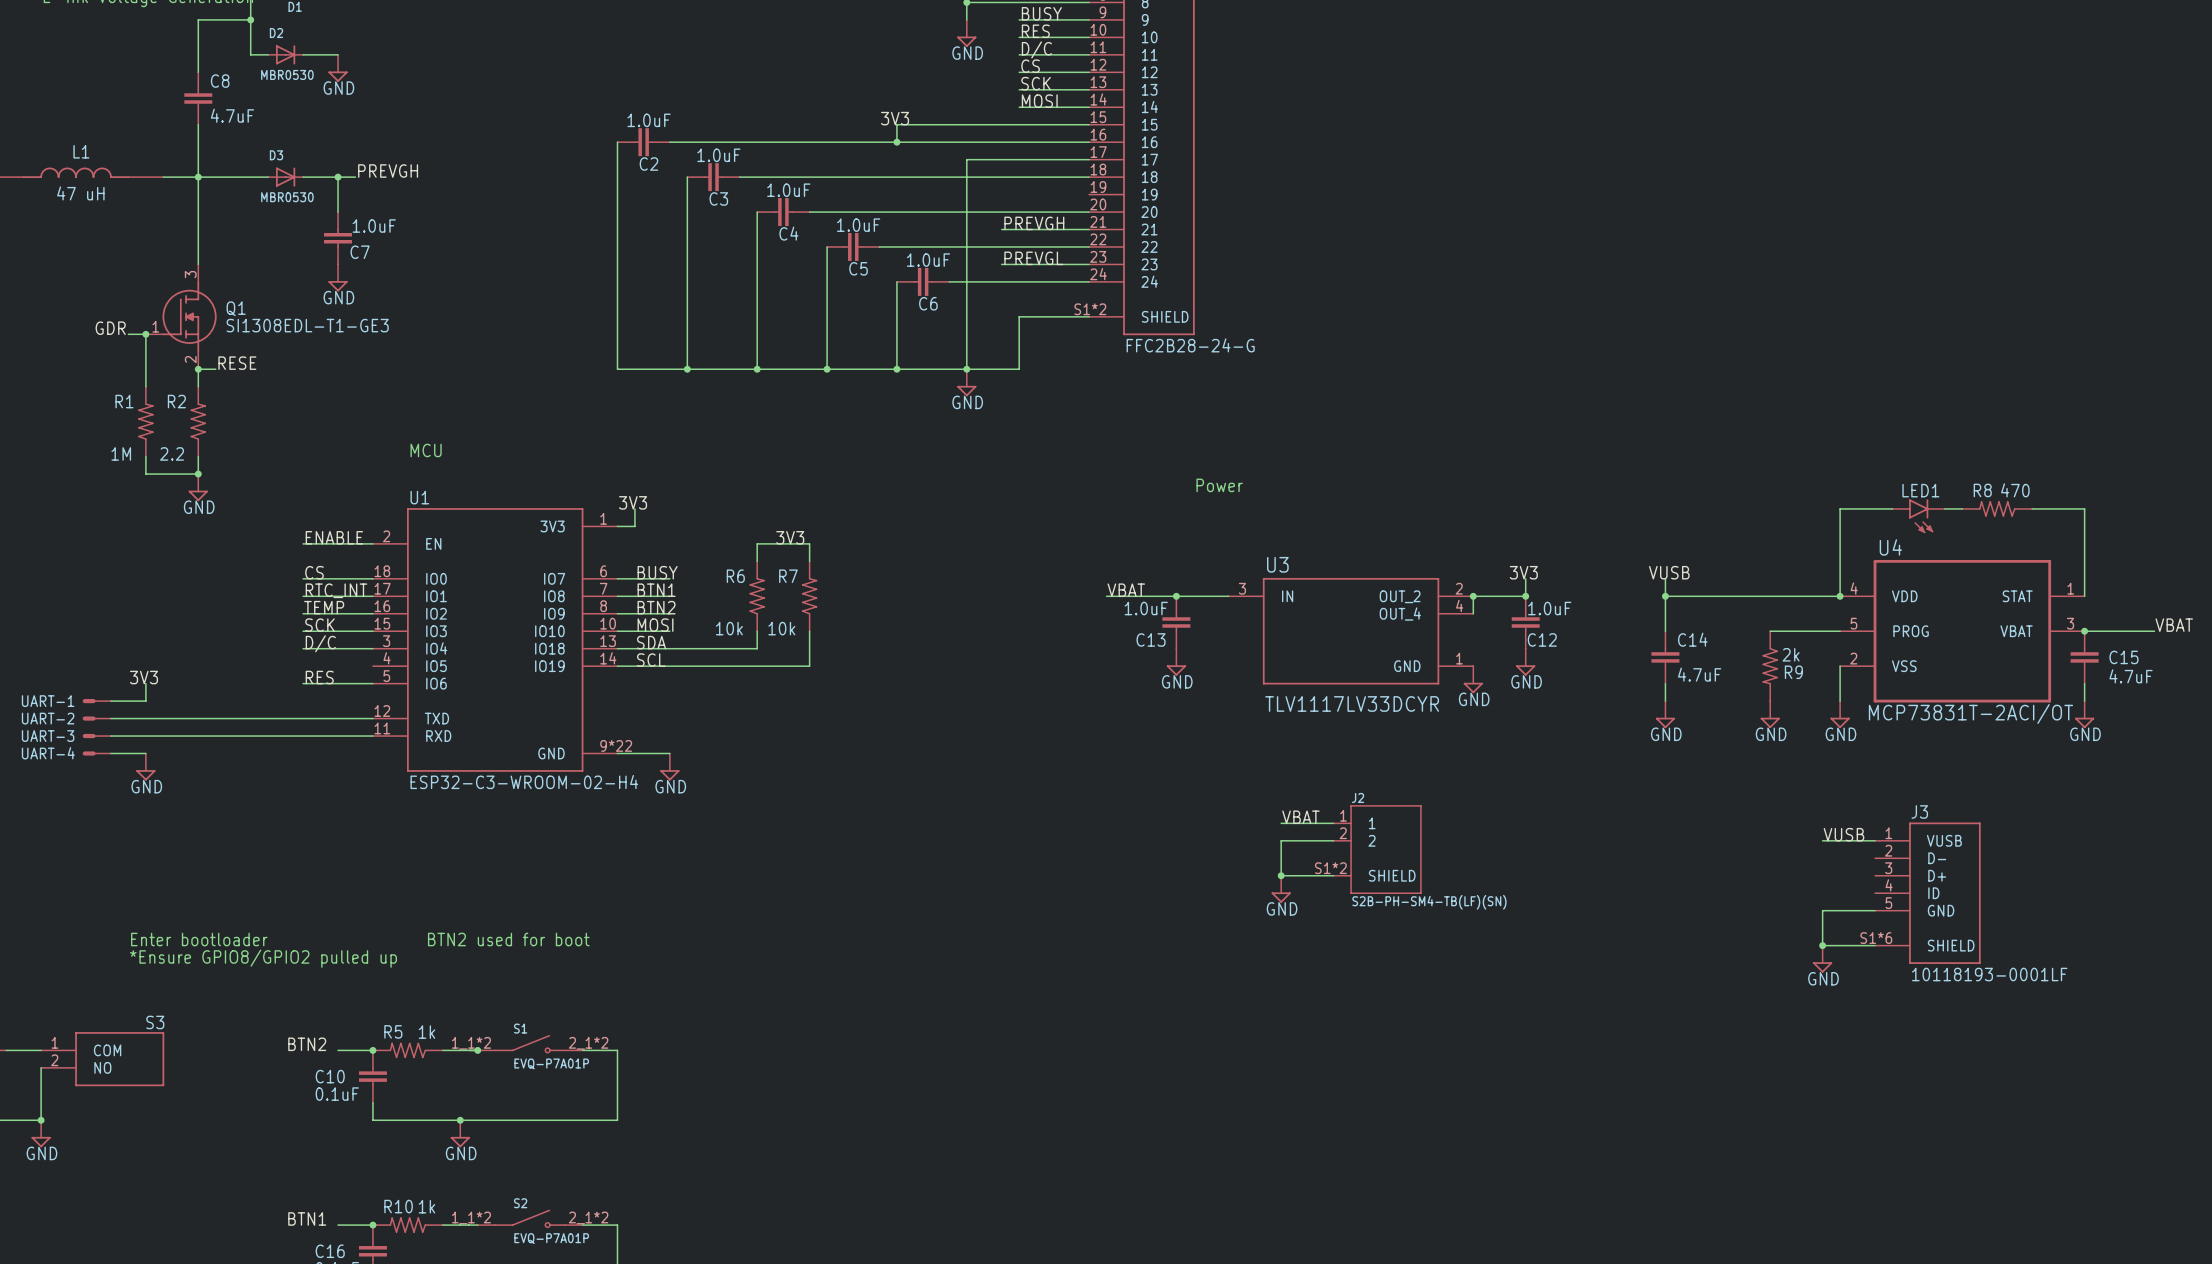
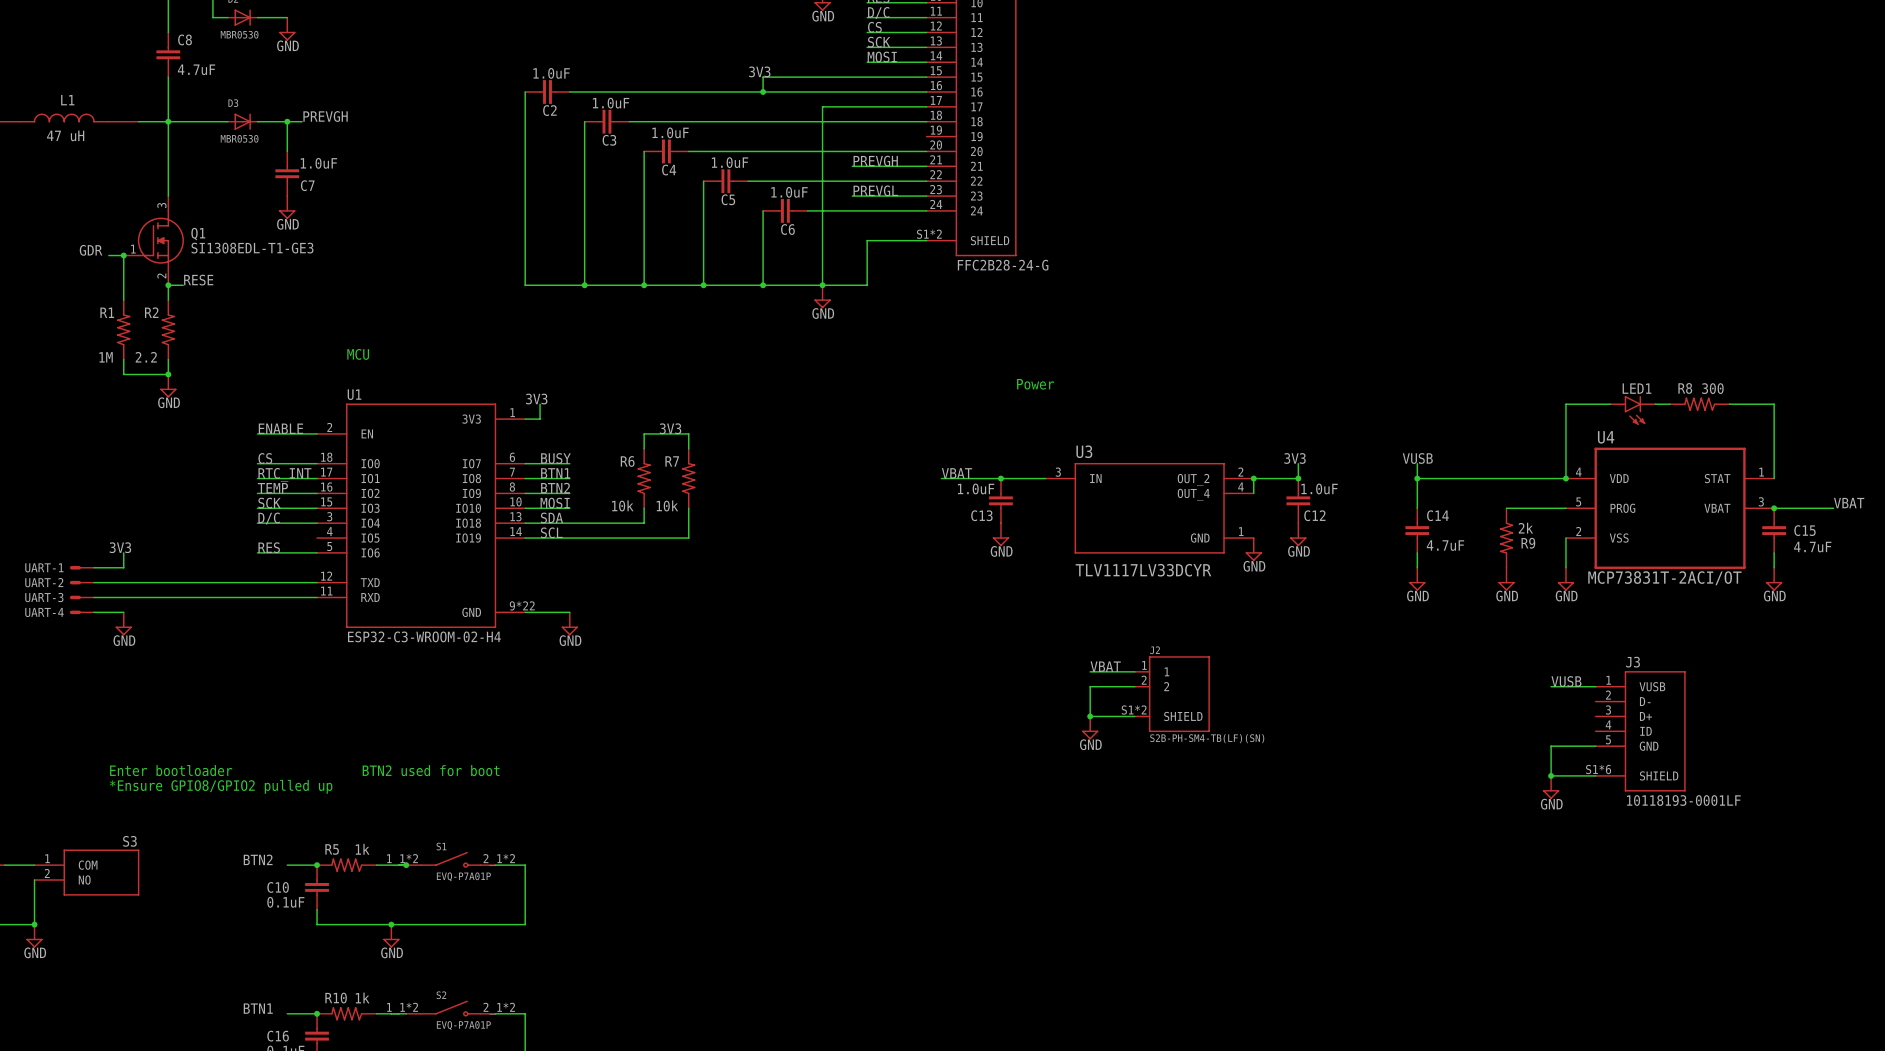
R8 value: 470 (2015, 490) -> 300 (1712, 388)

